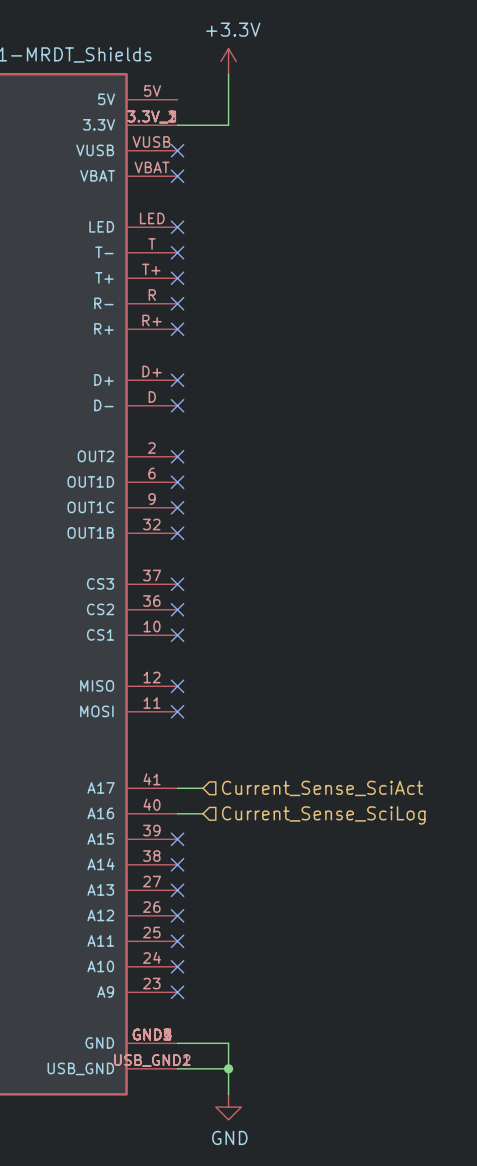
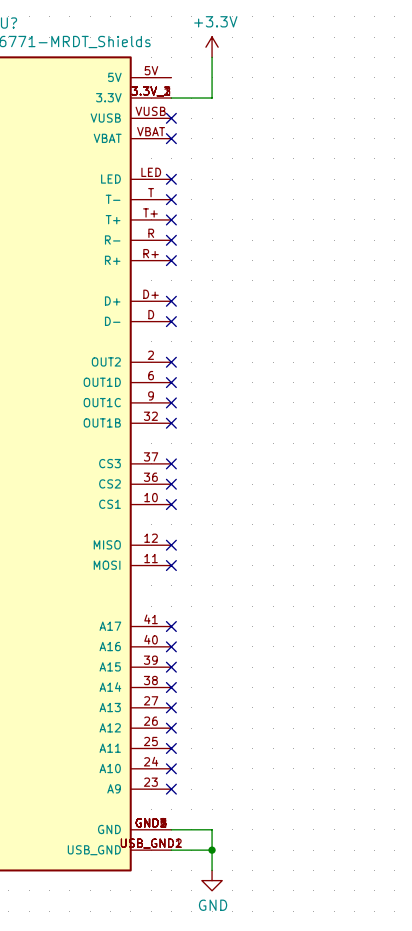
wire: (177, 788) (203, 788) -> none
no-connect mark: none -> (171, 626)
hierarchical label: Current_Sense_SciAct (322, 788) -> none
wire: (177, 813) (203, 813) -> none
no-connect mark: none -> (171, 646)
hierarchical label: Current_Sense_SciLog (323, 815) -> none

